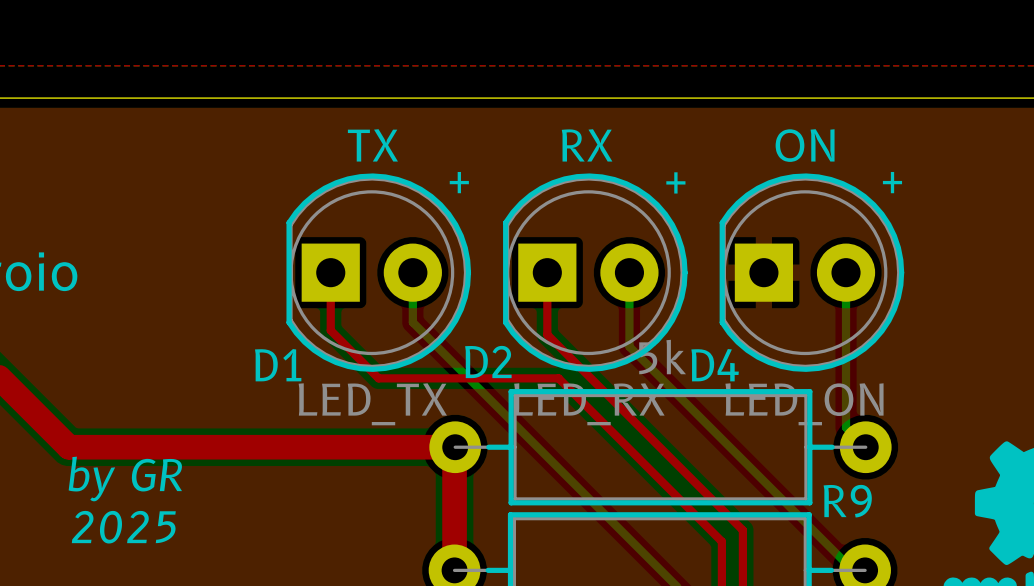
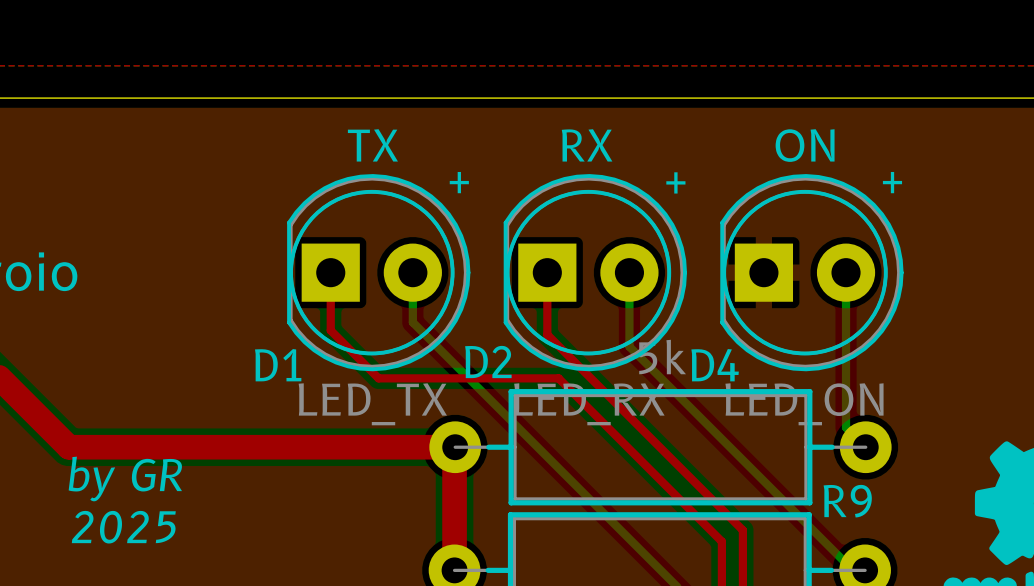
D1 footprint: [286, 173, 472, 372] -> [287, 174, 471, 372]
D2 footprint: [503, 173, 688, 372] -> [503, 174, 687, 372]
D4 footprint: [719, 173, 905, 372] -> [720, 174, 904, 372]

